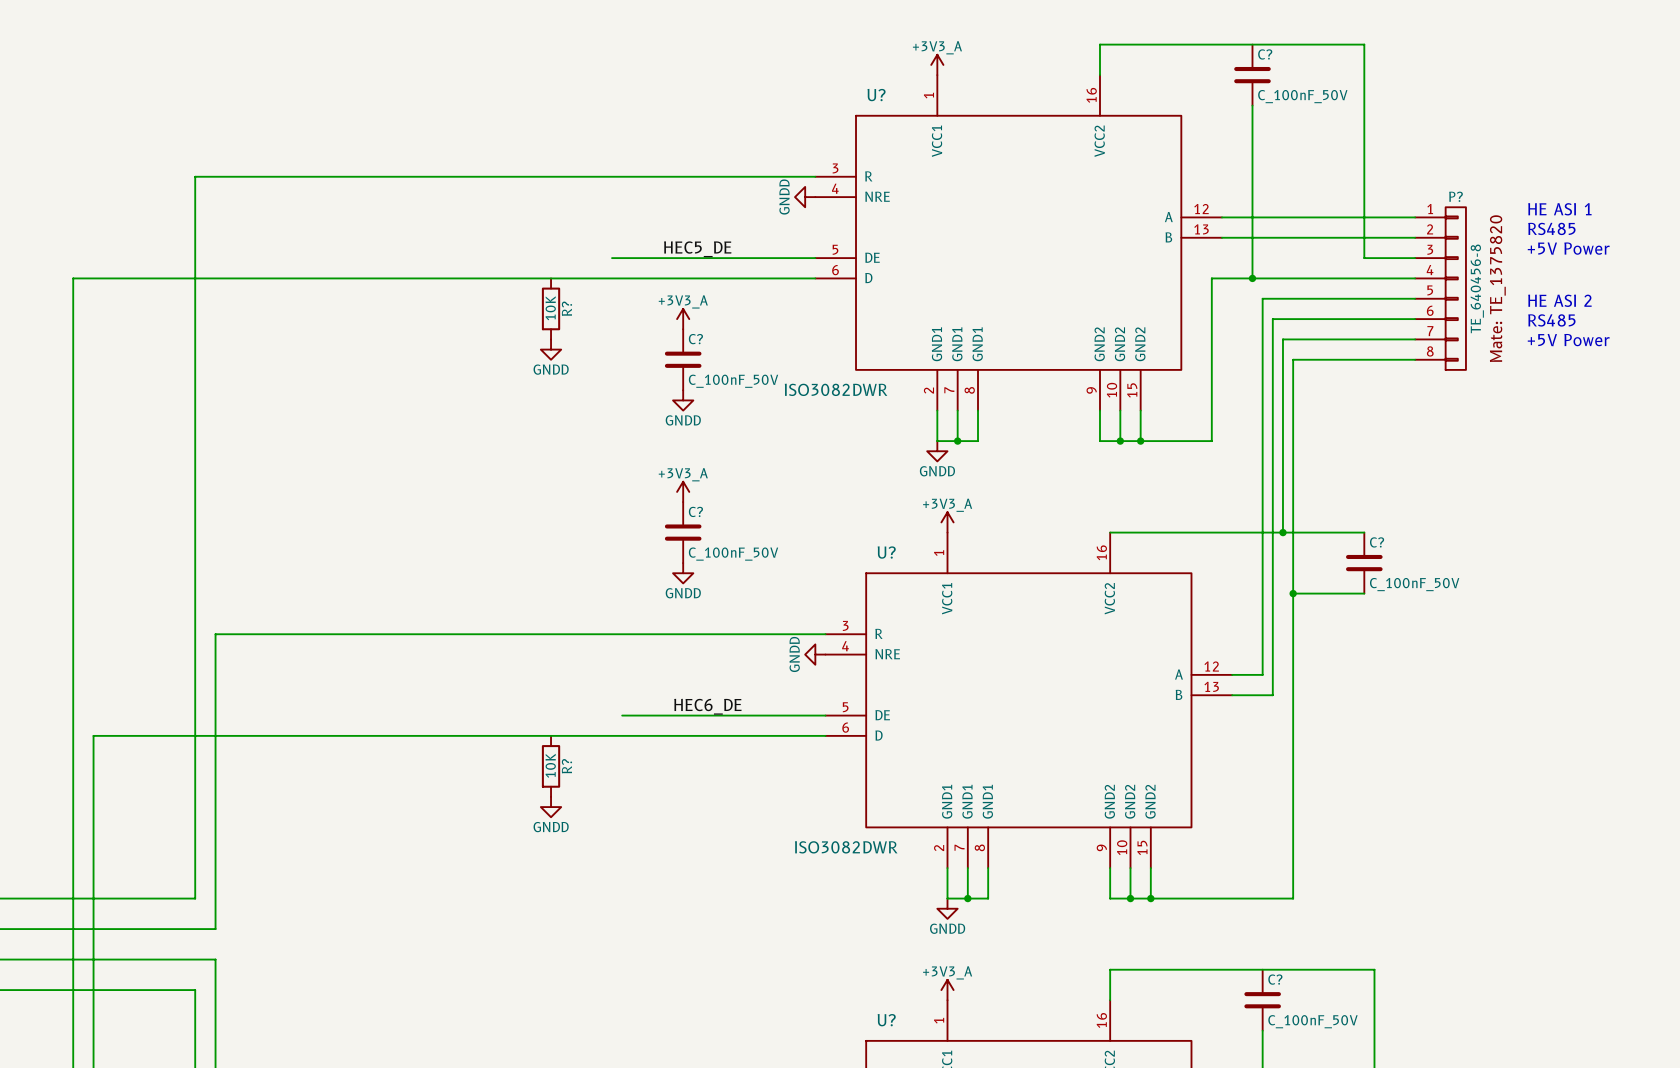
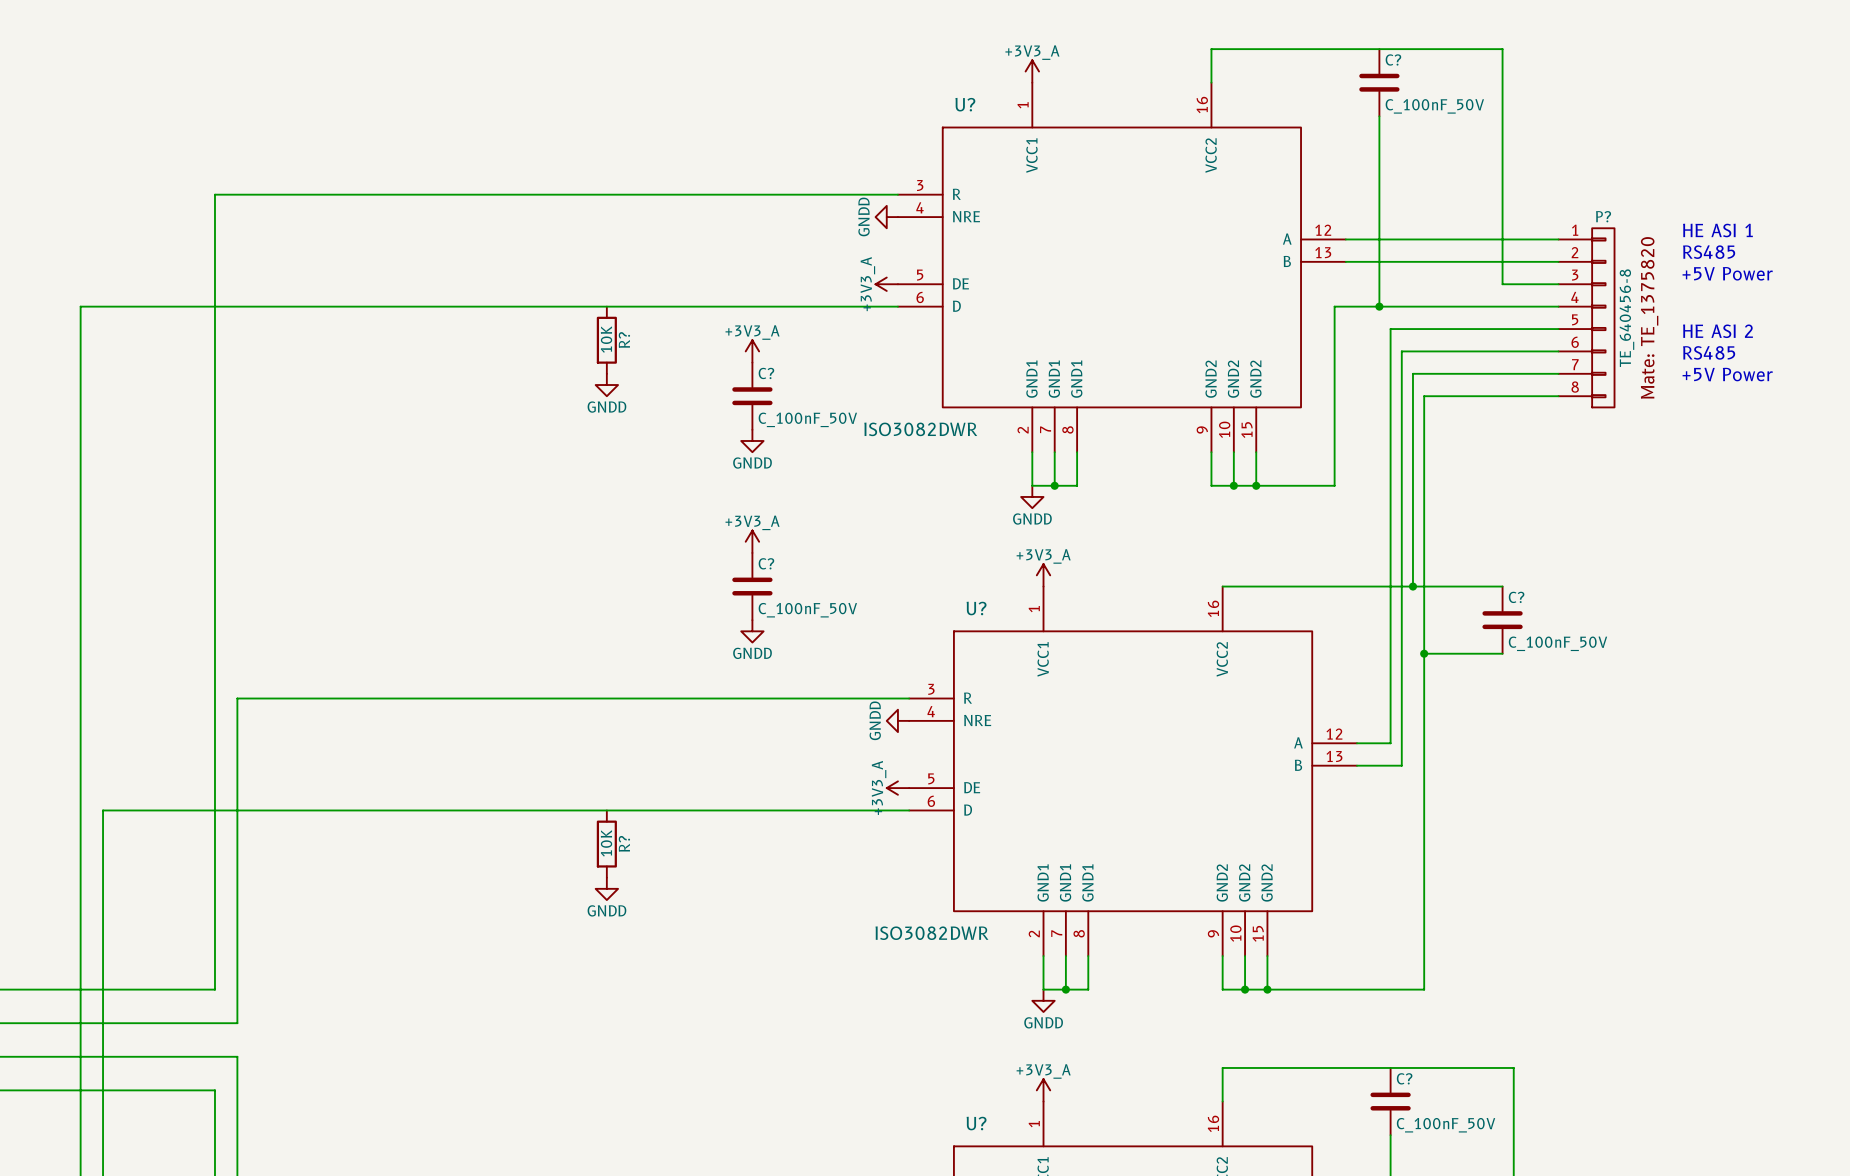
label: HEC5_DE (697, 249) -> none
wire: (612, 258) (815, 258) -> none
power symbol: none -> +3V3_A (886, 284)
label: HEC6_DE (707, 706) -> none
wire: (622, 715) (825, 715) -> none
power symbol: none -> +3V3_A (897, 788)

